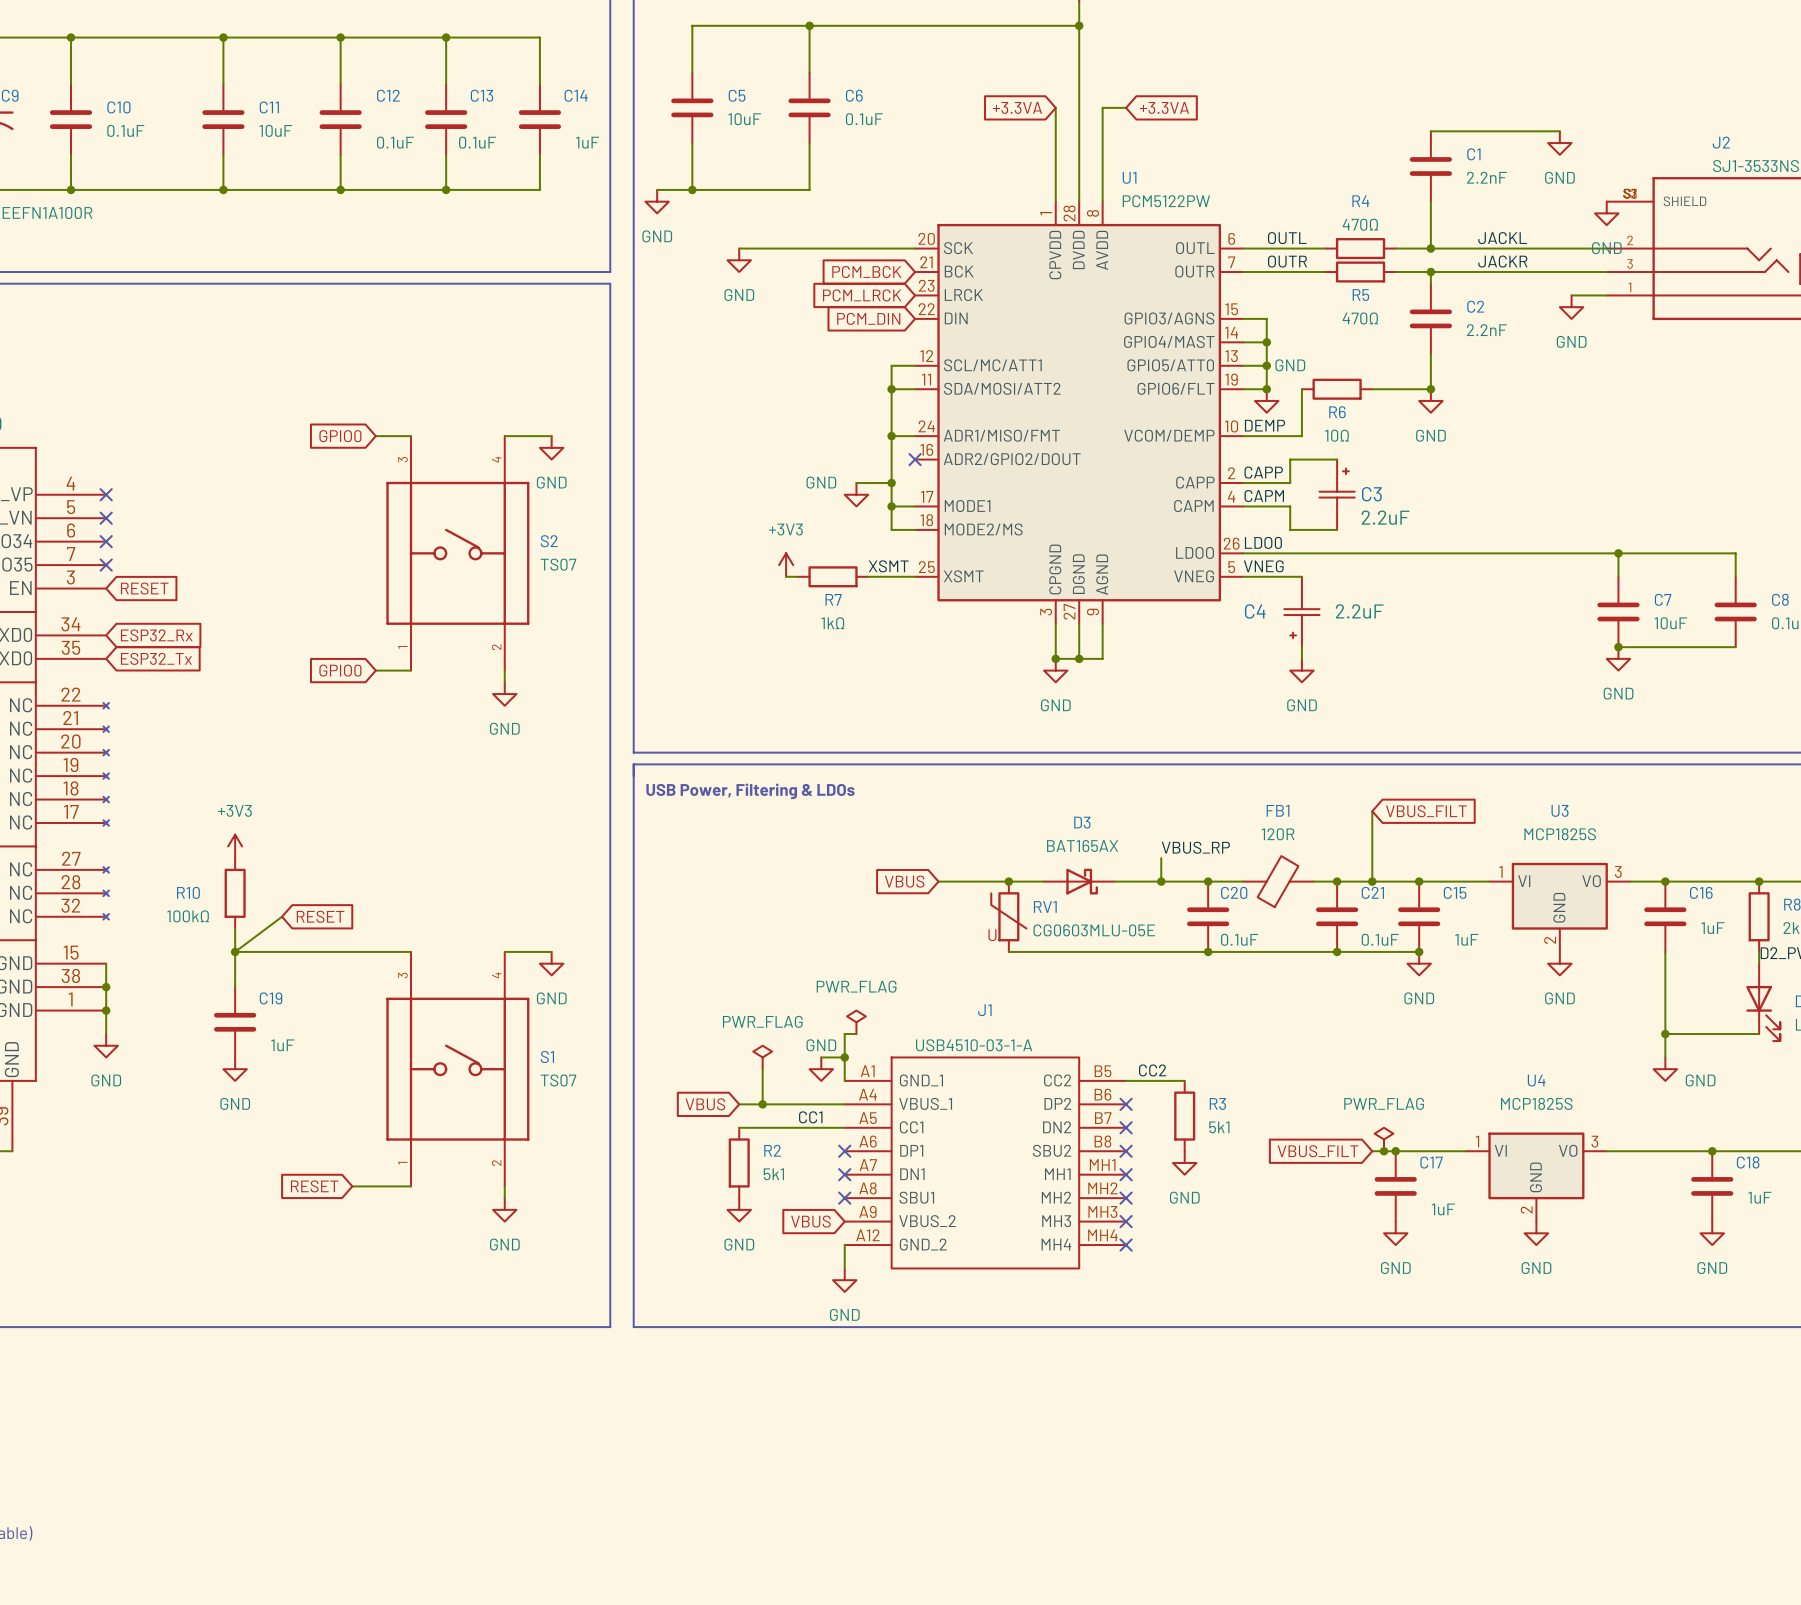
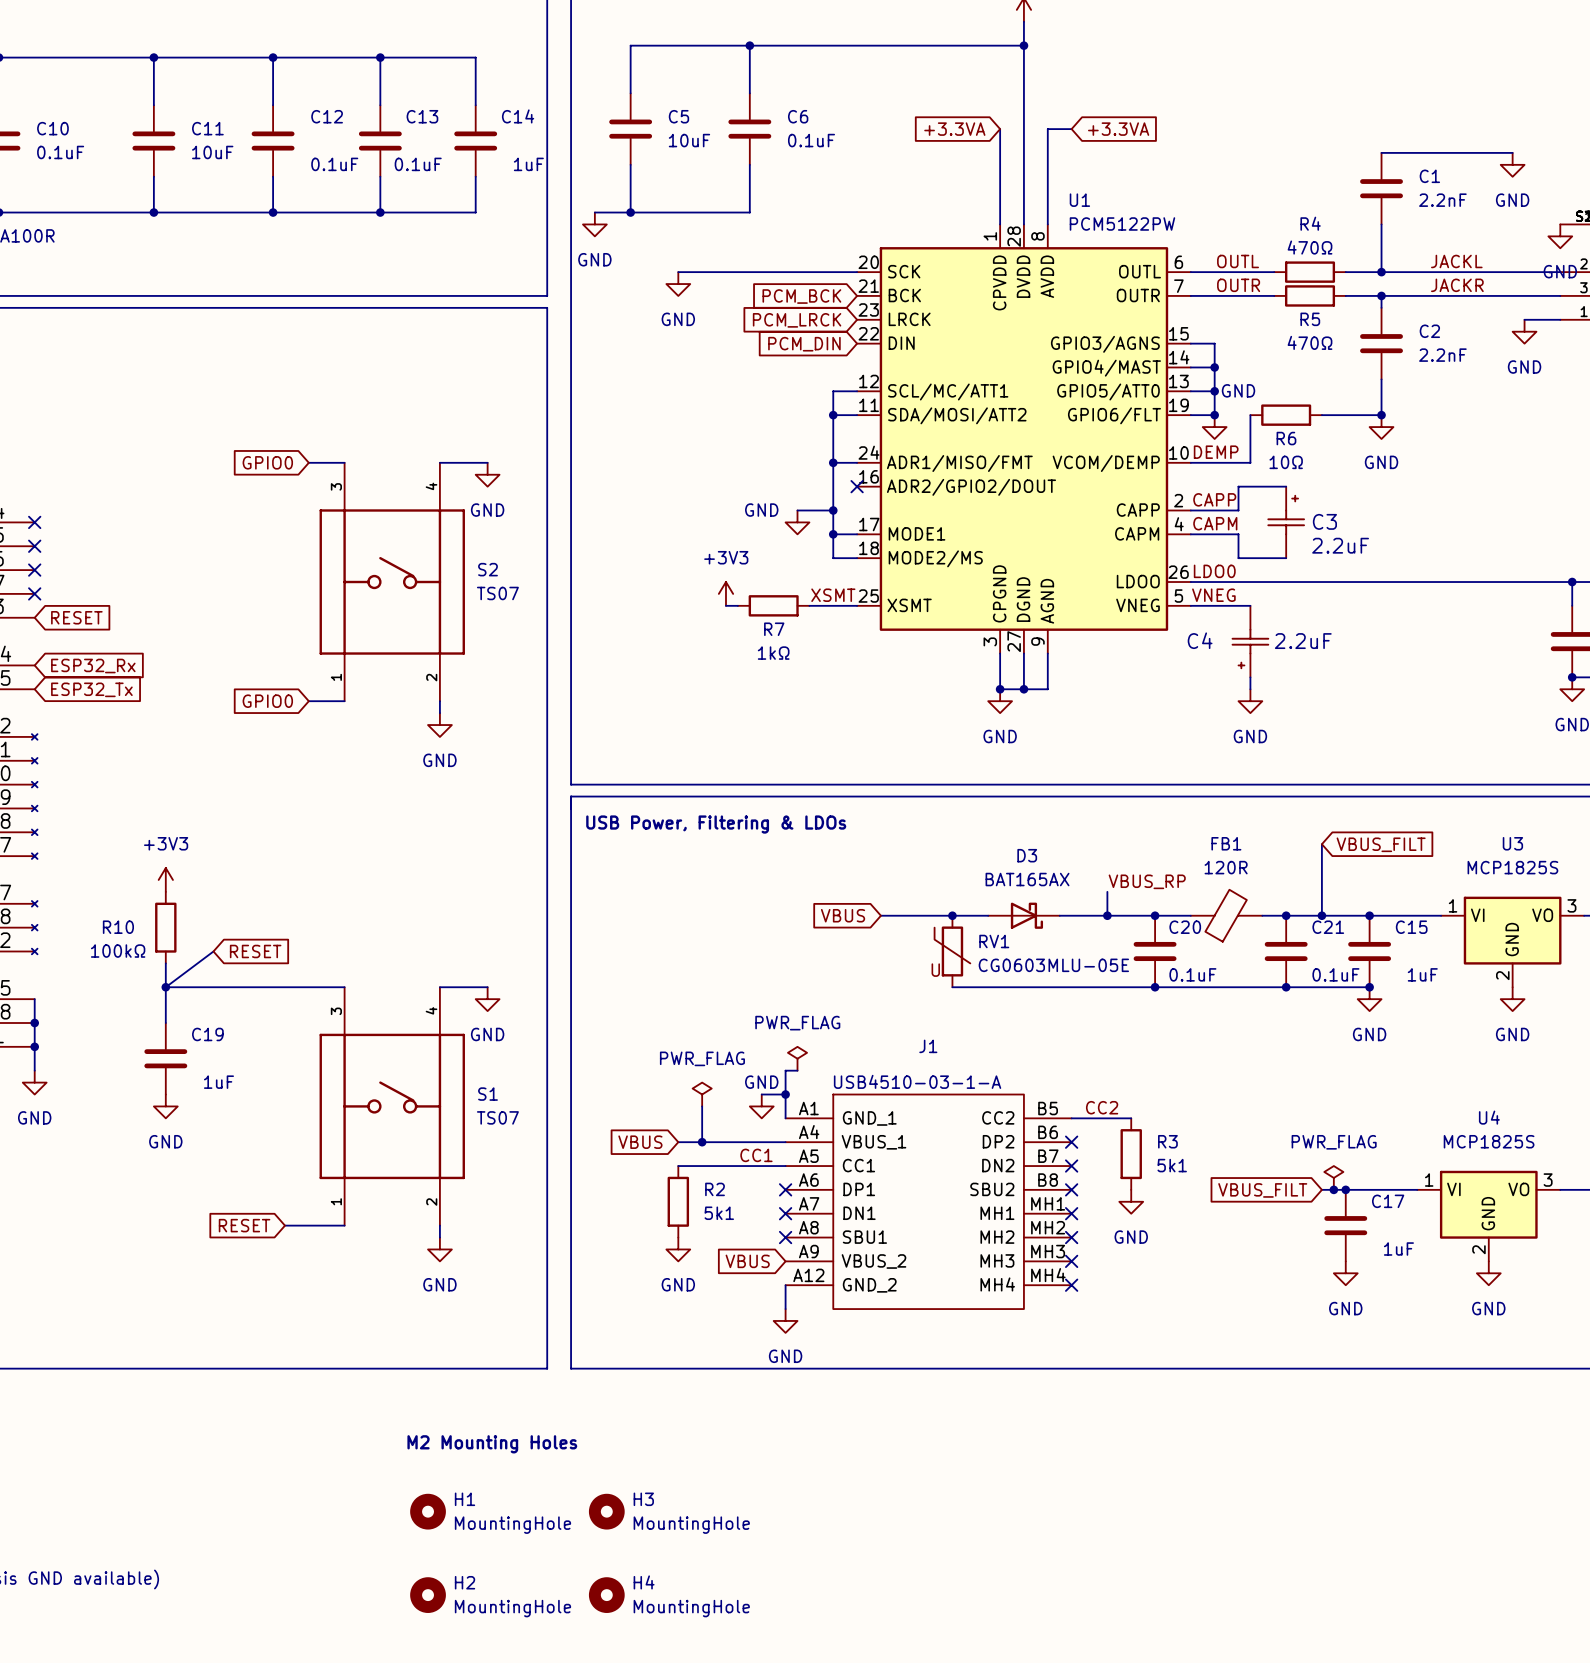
text: none -> M2 Mounting Holes (492, 1444)
H1: none -> MountingHole (428, 1511)
H3: none -> MountingHole (606, 1511)
H2: none -> MountingHole (428, 1595)
H4: none -> MountingHole (606, 1595)

